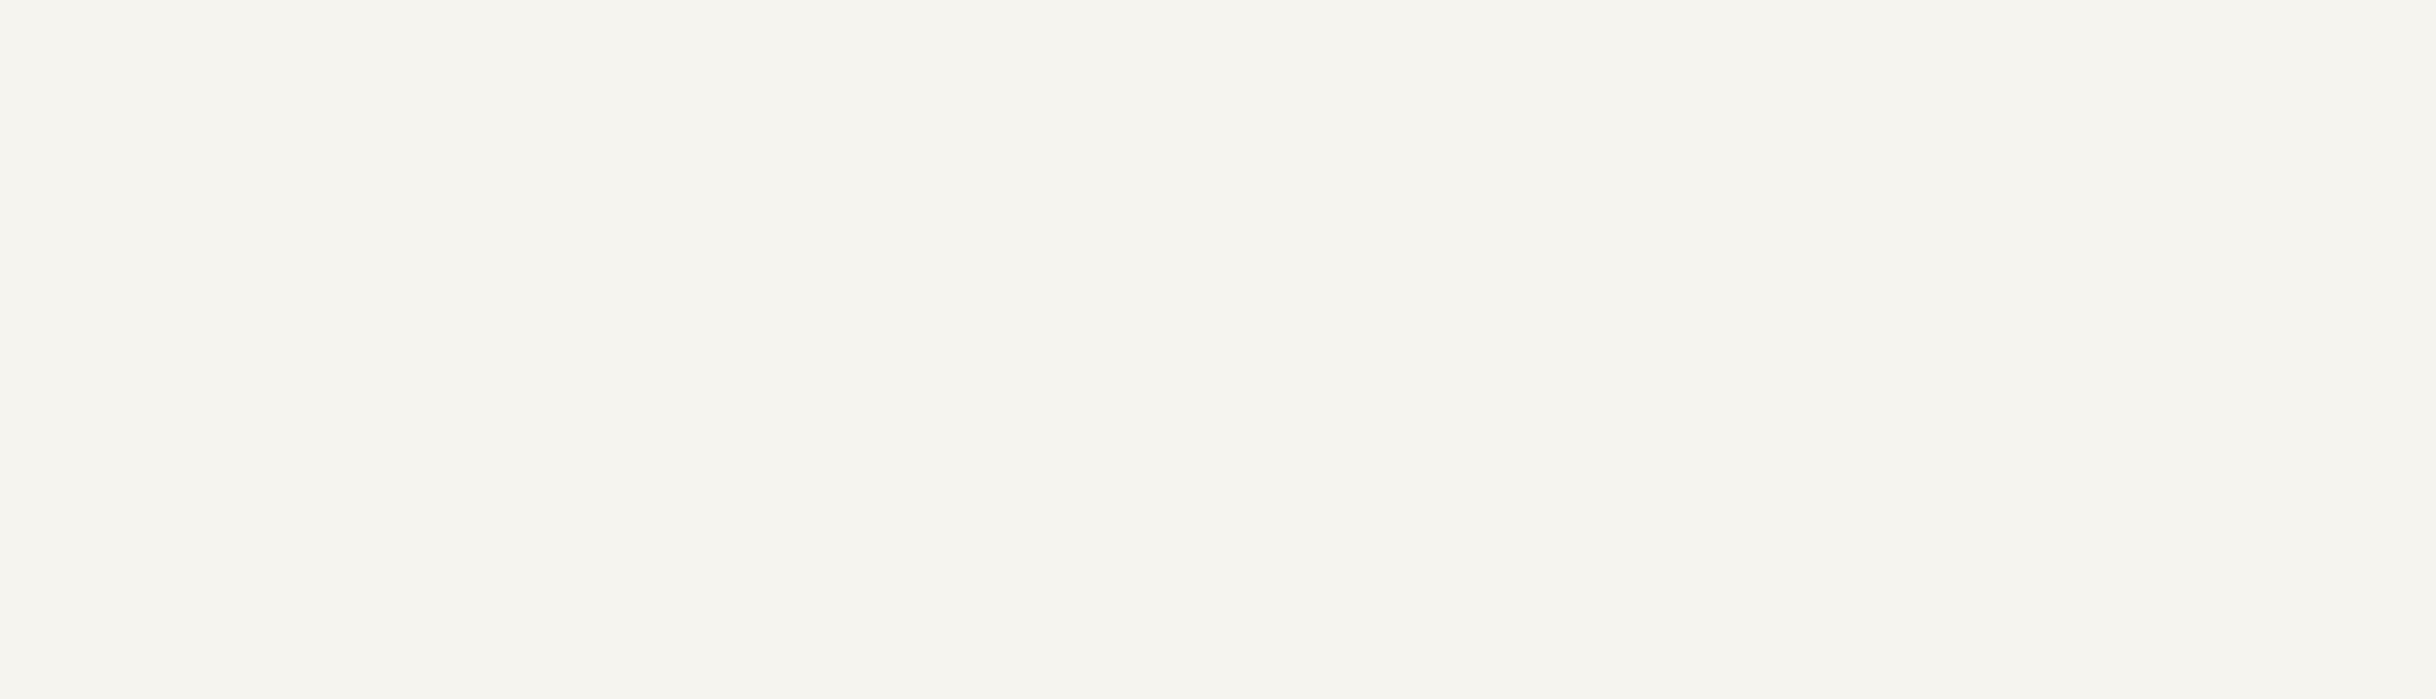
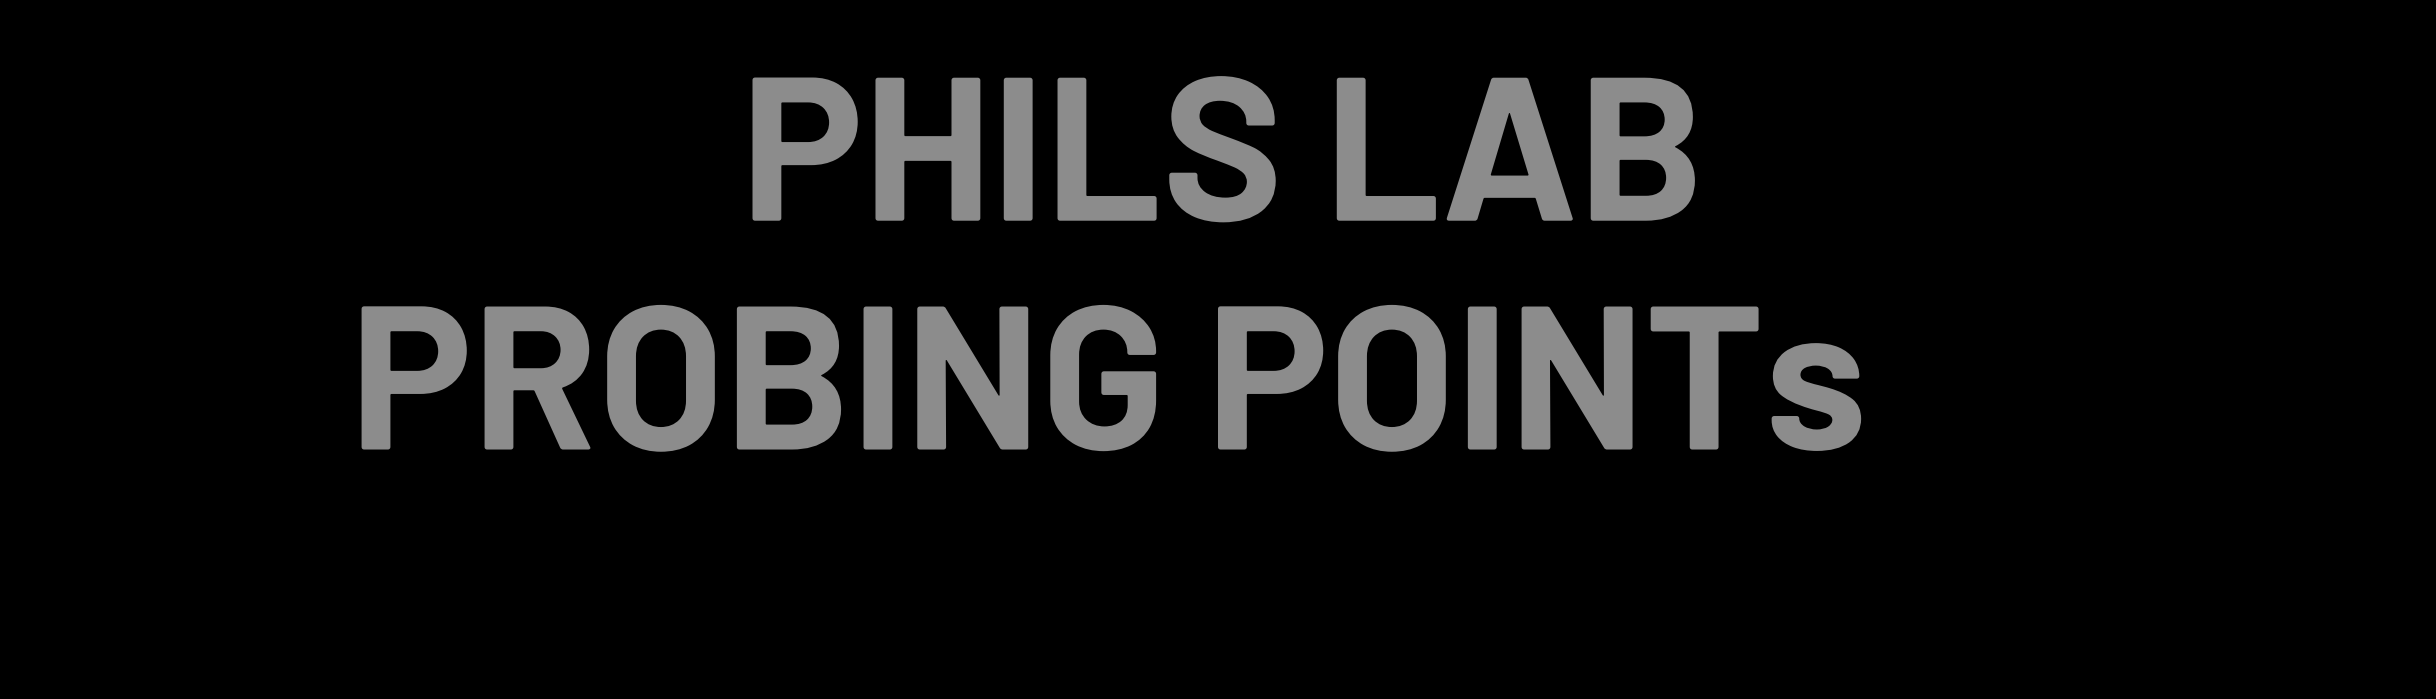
text: none -> PHILS LAB (1223, 149)
text: none -> PROBING POINTs (1111, 378)

